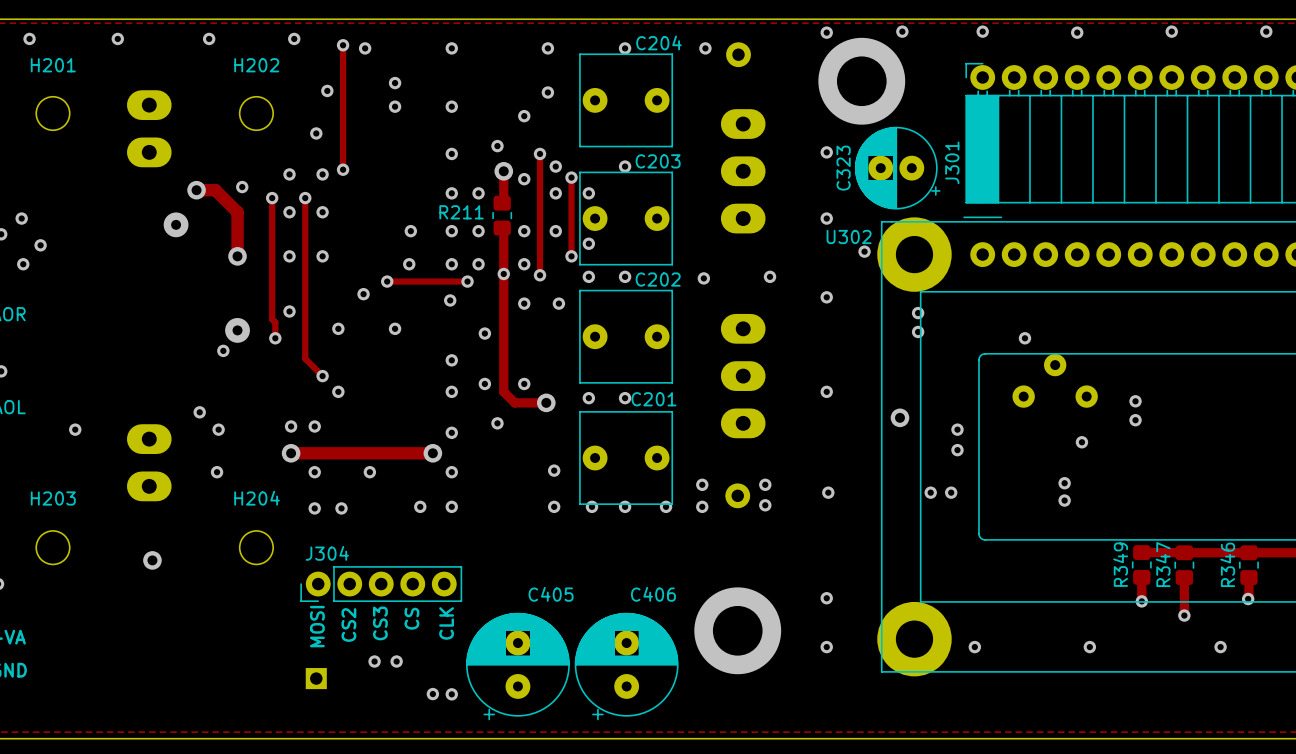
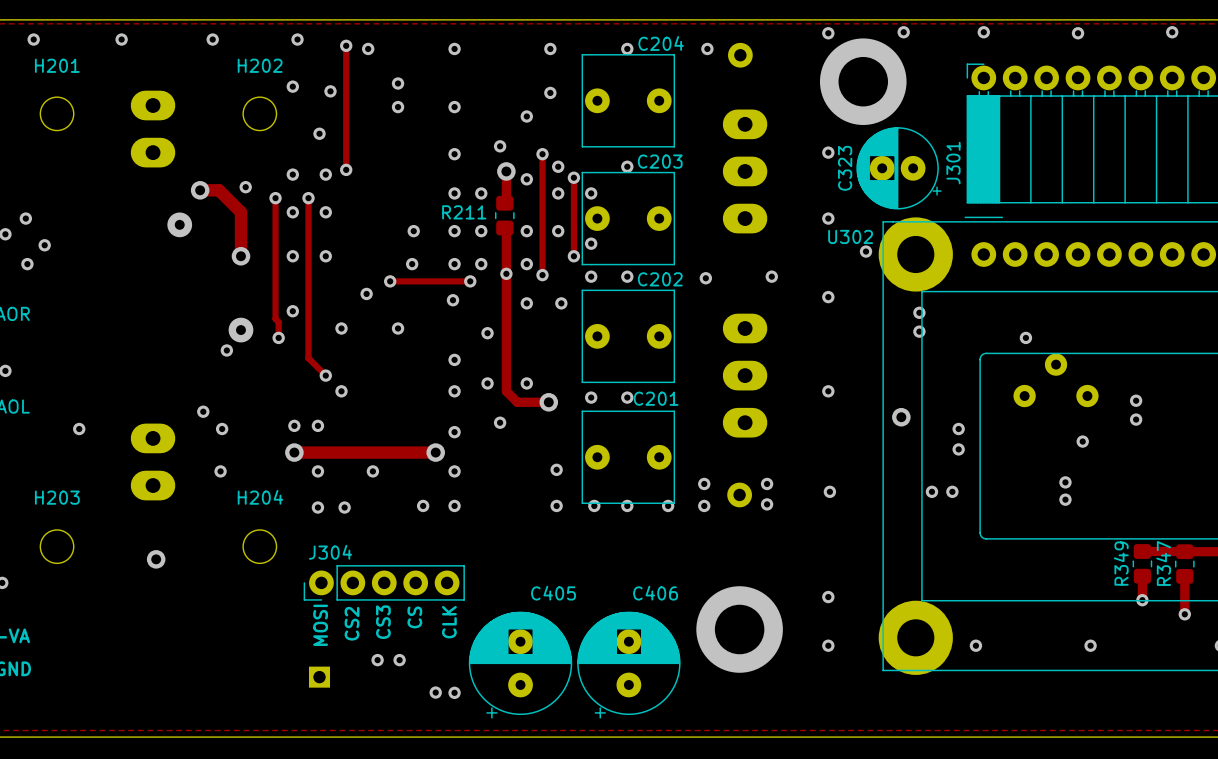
via: none -> (292, 86)

